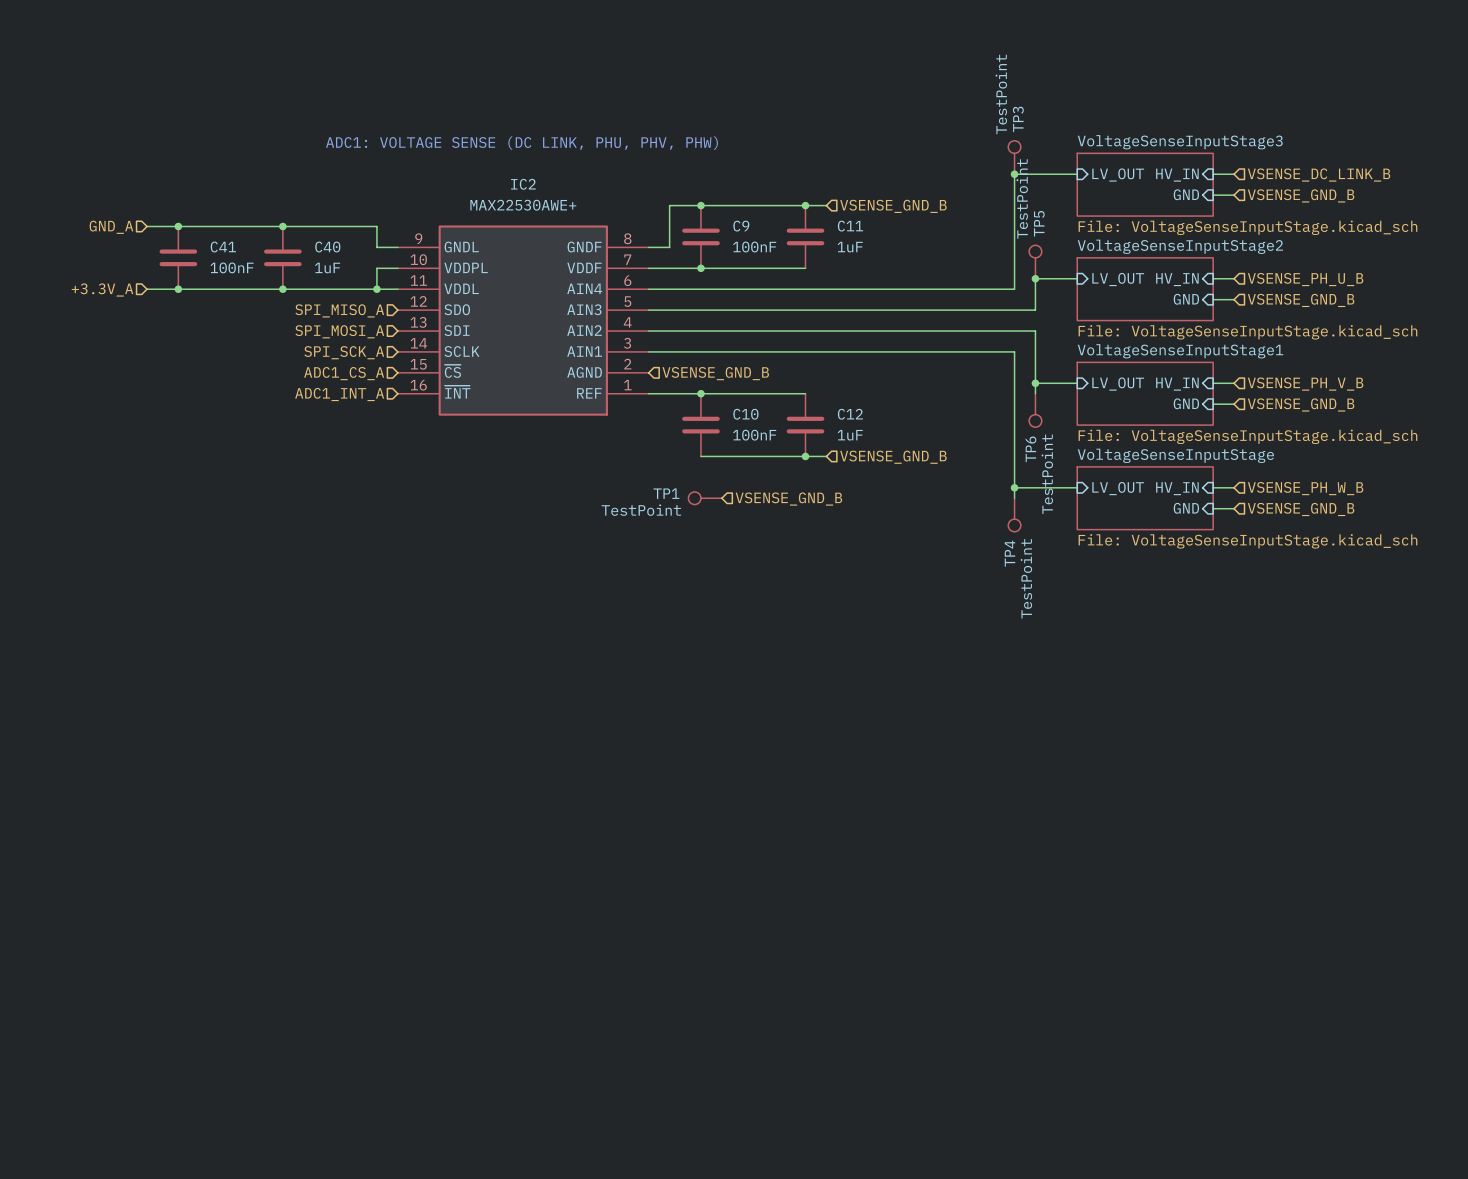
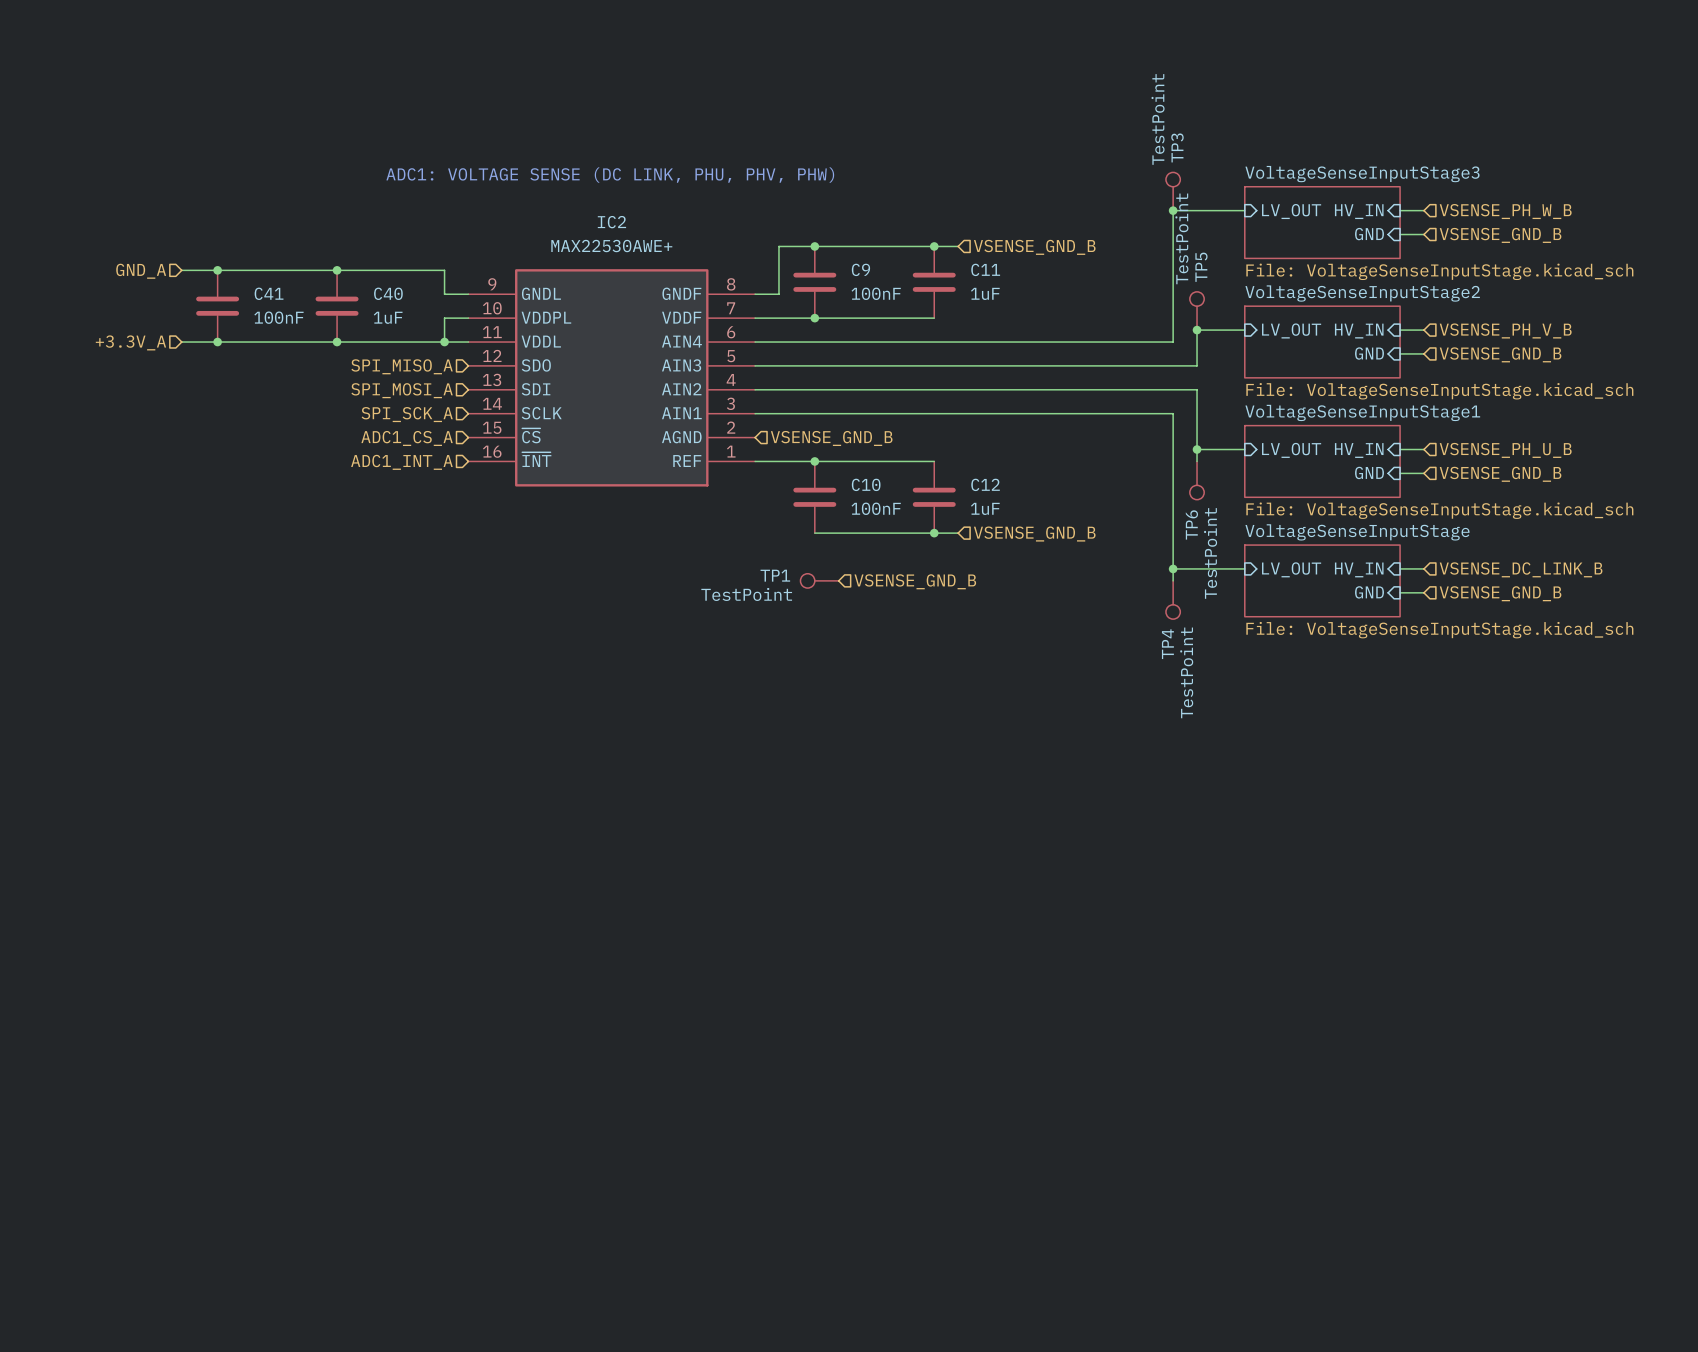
hierarchical label: VSENSE_DC_LINK_B (1319, 175) -> VSENSE_PH_W_B (1505, 211)
hierarchical label: VSENSE_PH_U_B (1305, 279) -> VSENSE_PH_V_B (1505, 330)
hierarchical label: VSENSE_PH_V_B (1305, 384) -> VSENSE_PH_U_B (1505, 450)
hierarchical label: VSENSE_PH_W_B (1305, 488) -> VSENSE_DC_LINK_B (1521, 569)

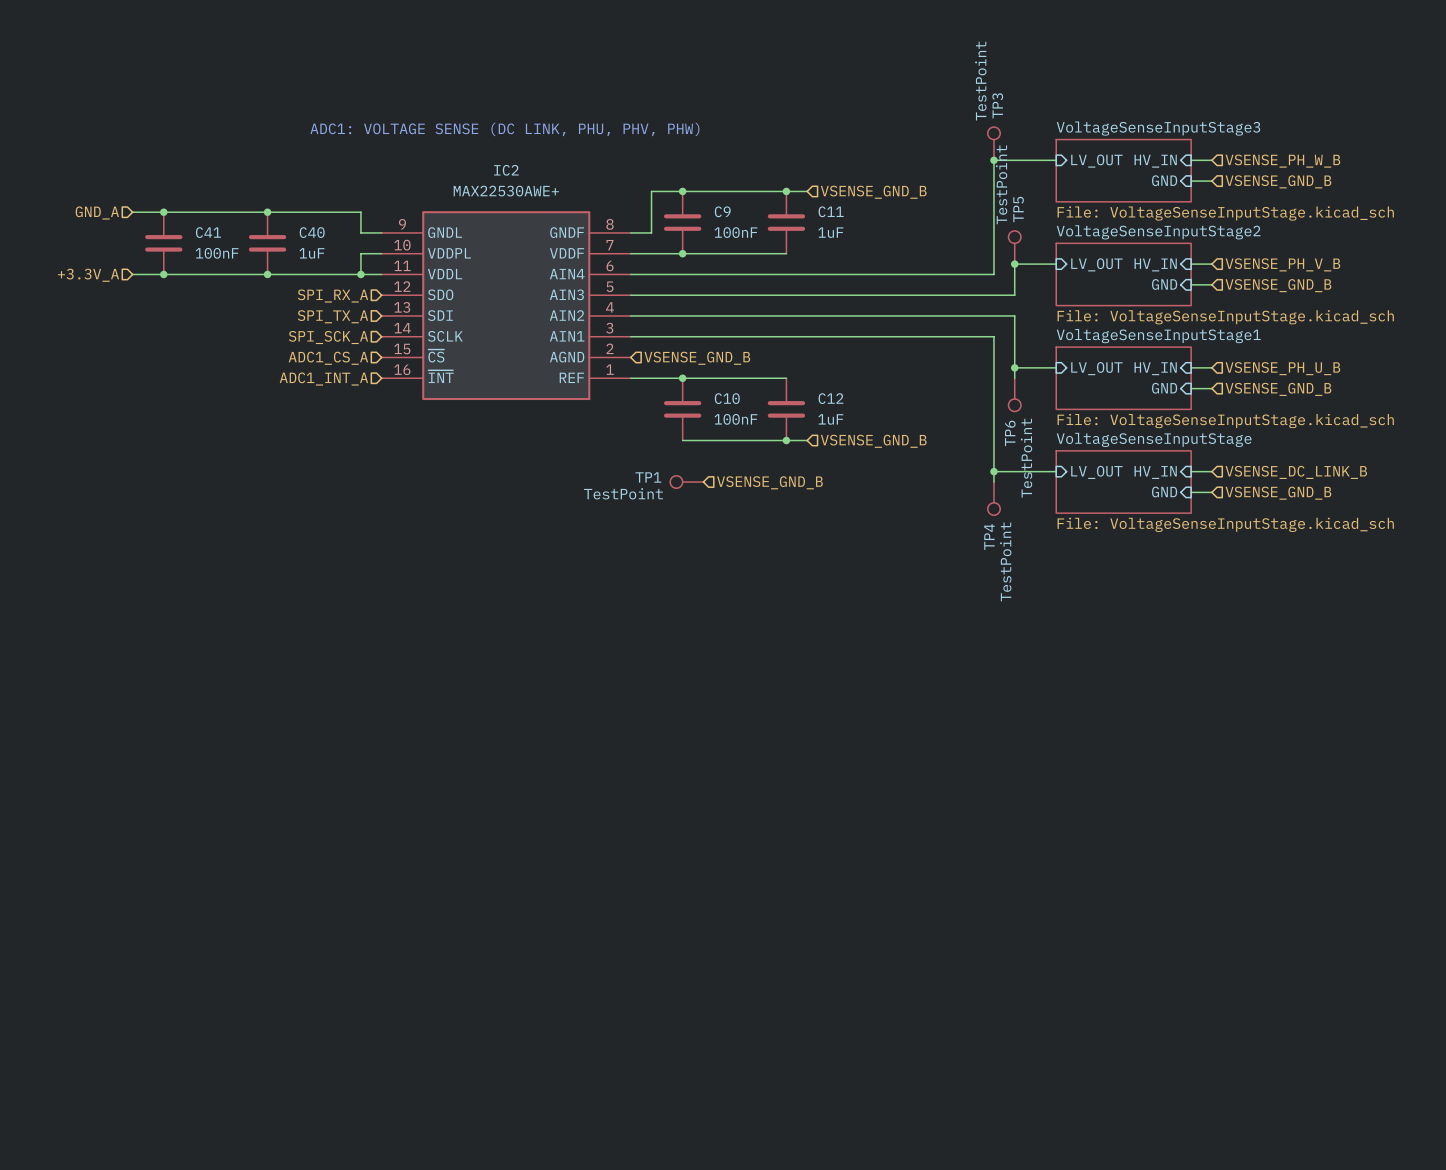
hierarchical label: SPI_MISO_A (402, 366) -> SPI_RX_A (332, 296)
hierarchical label: SPI_MOSI_A (402, 390) -> SPI_TX_A (332, 316)

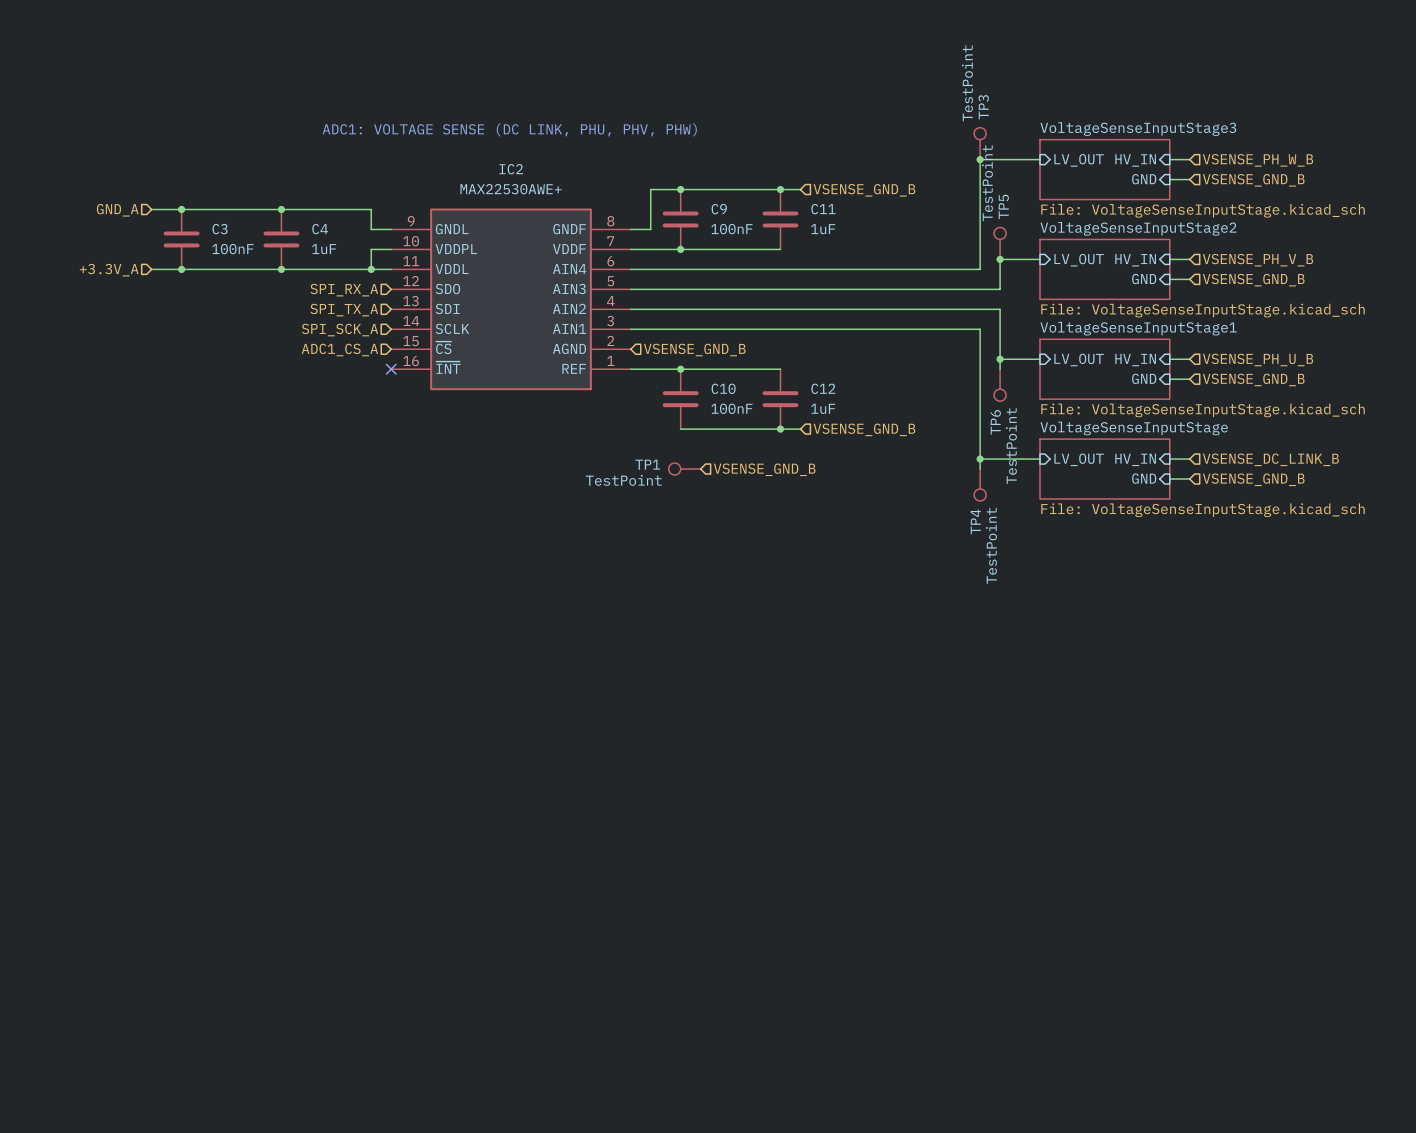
C41 name: C41 (208, 232) -> C3 (220, 229)
C40 name: C40 (312, 232) -> C4 (320, 229)
no-connect mark: none -> (391, 369)
hierarchical label: ADC1_INT_A (323, 379) -> none

